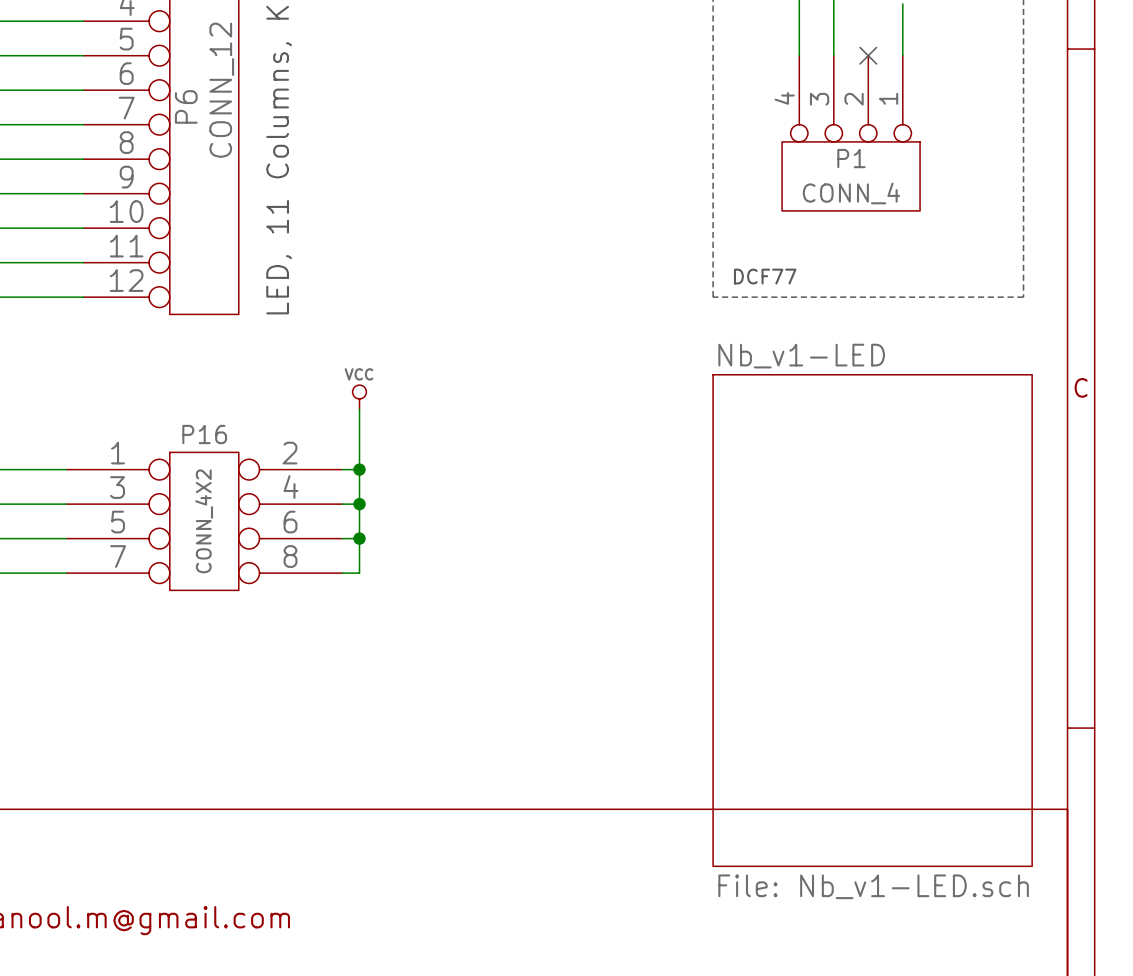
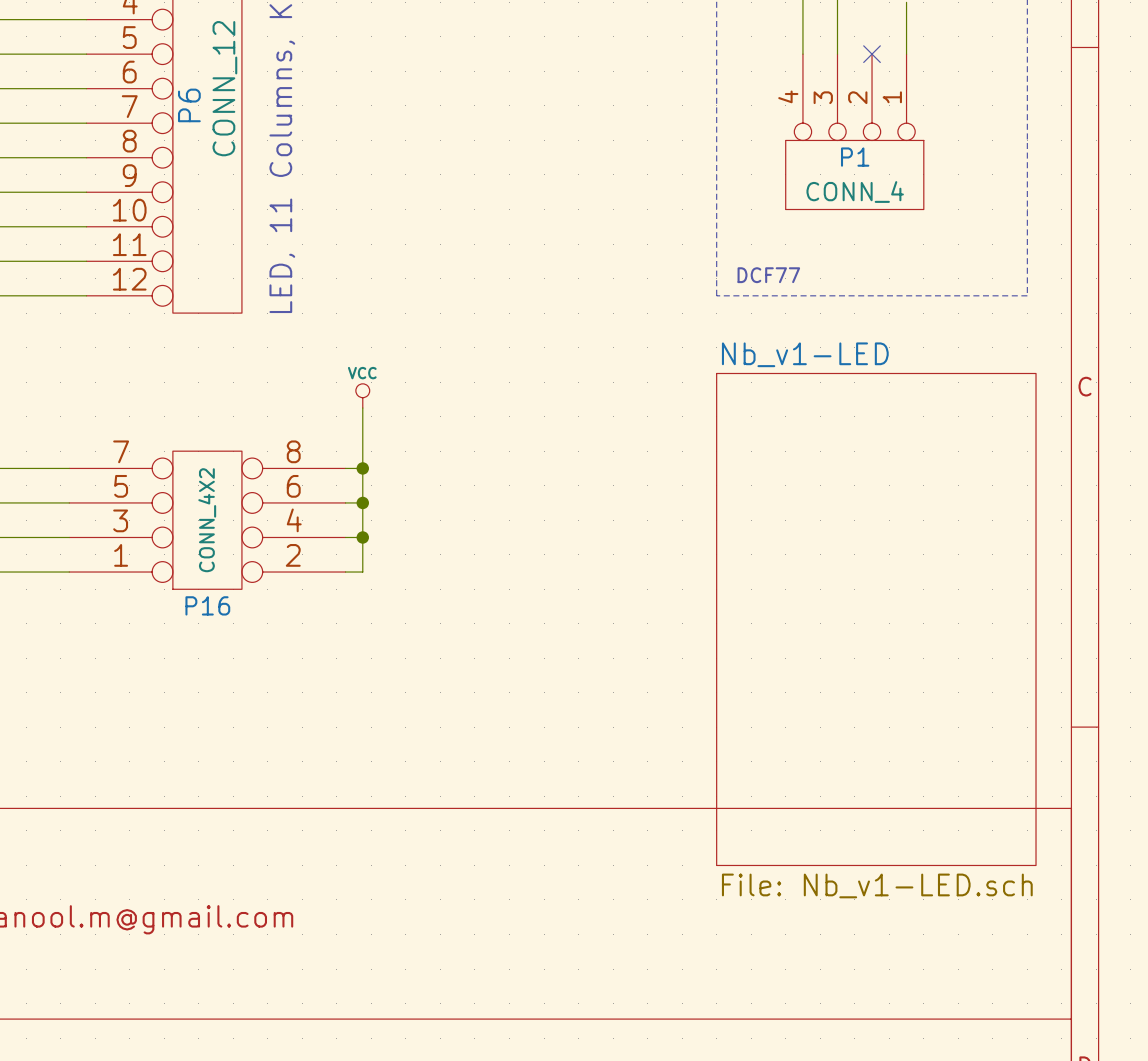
P16 flip: as is (204, 521) -> up-down (207, 520)

